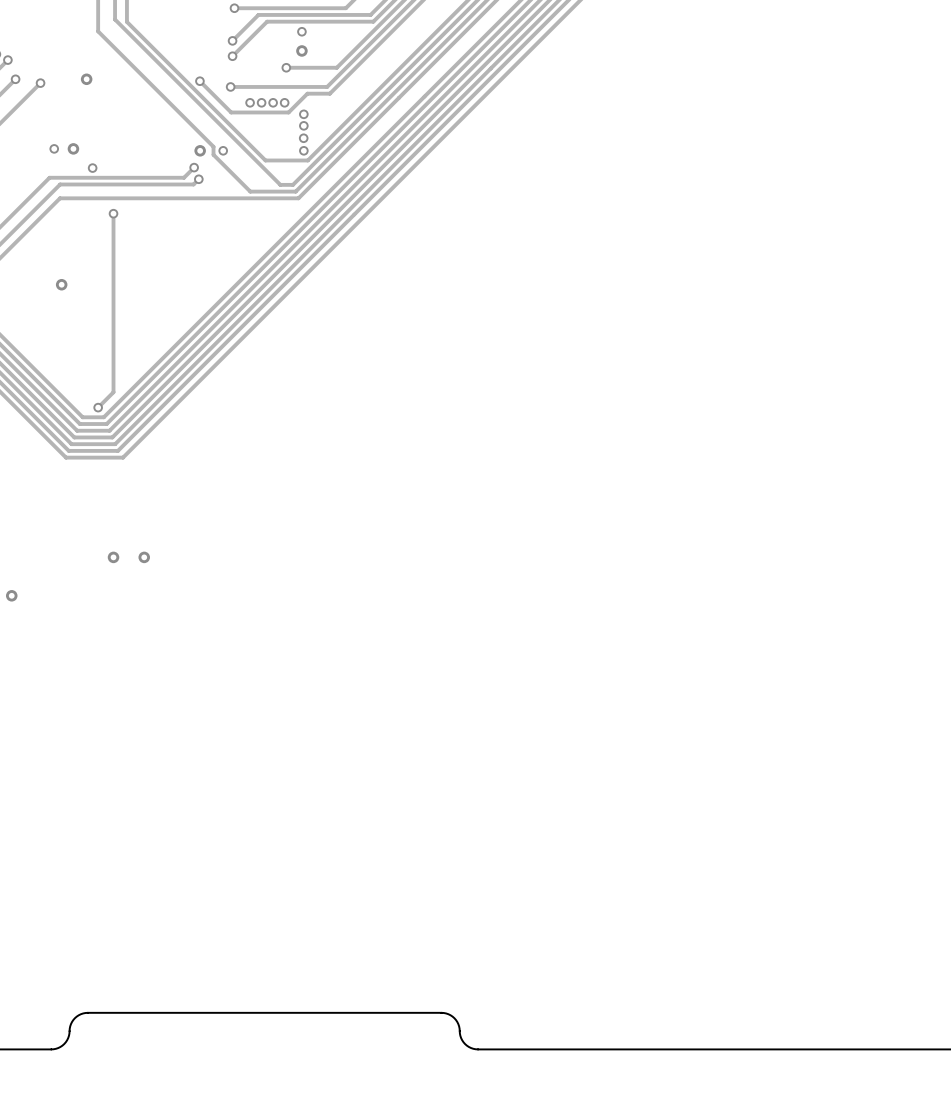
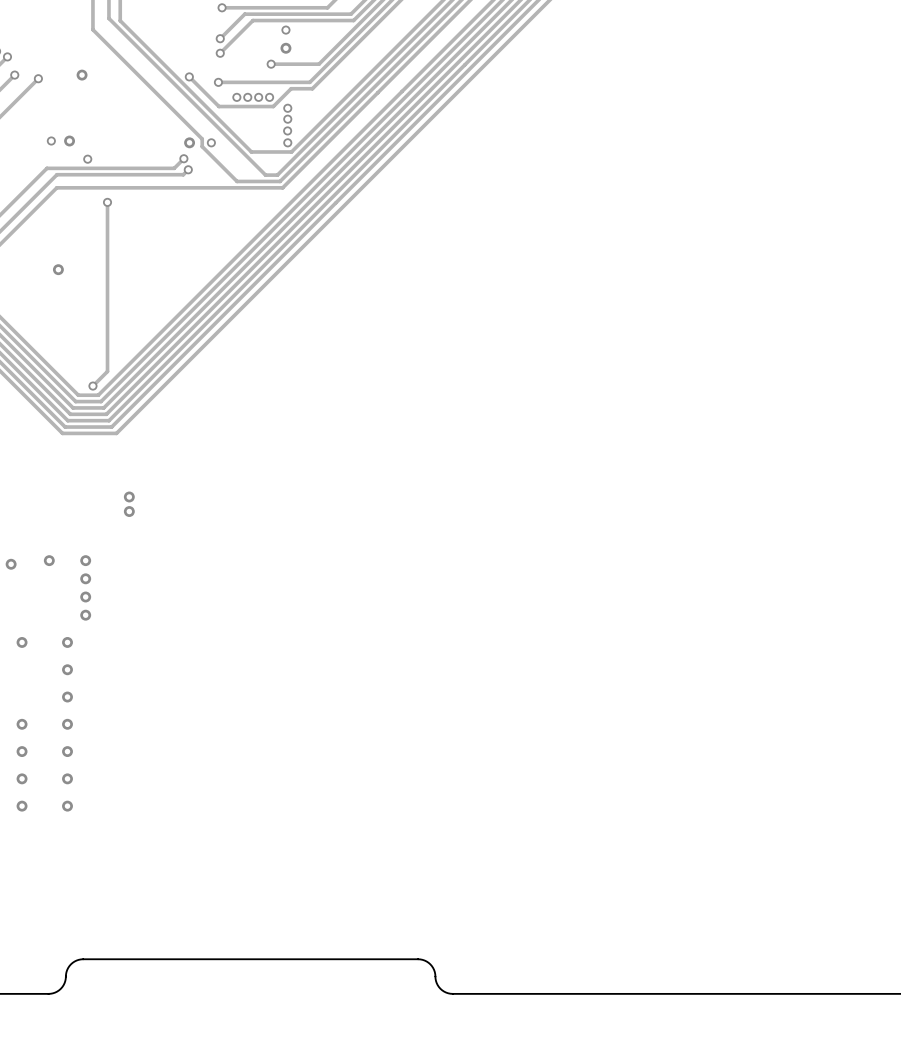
via: none -> (129, 496)
via: none -> (129, 511)
via: (113, 557) -> none
via: (144, 557) -> none
via: none -> (49, 560)
via: none -> (85, 560)
via: none -> (85, 578)
via: none -> (85, 597)
via: none -> (85, 615)
via: none -> (22, 642)
via: none -> (67, 642)
via: none -> (67, 669)
via: none -> (67, 697)
via: none -> (22, 724)
via: none -> (67, 724)
via: none -> (22, 751)
via: none -> (67, 751)
via: none -> (22, 778)
via: none -> (67, 778)
via: none -> (22, 806)
via: none -> (67, 806)

